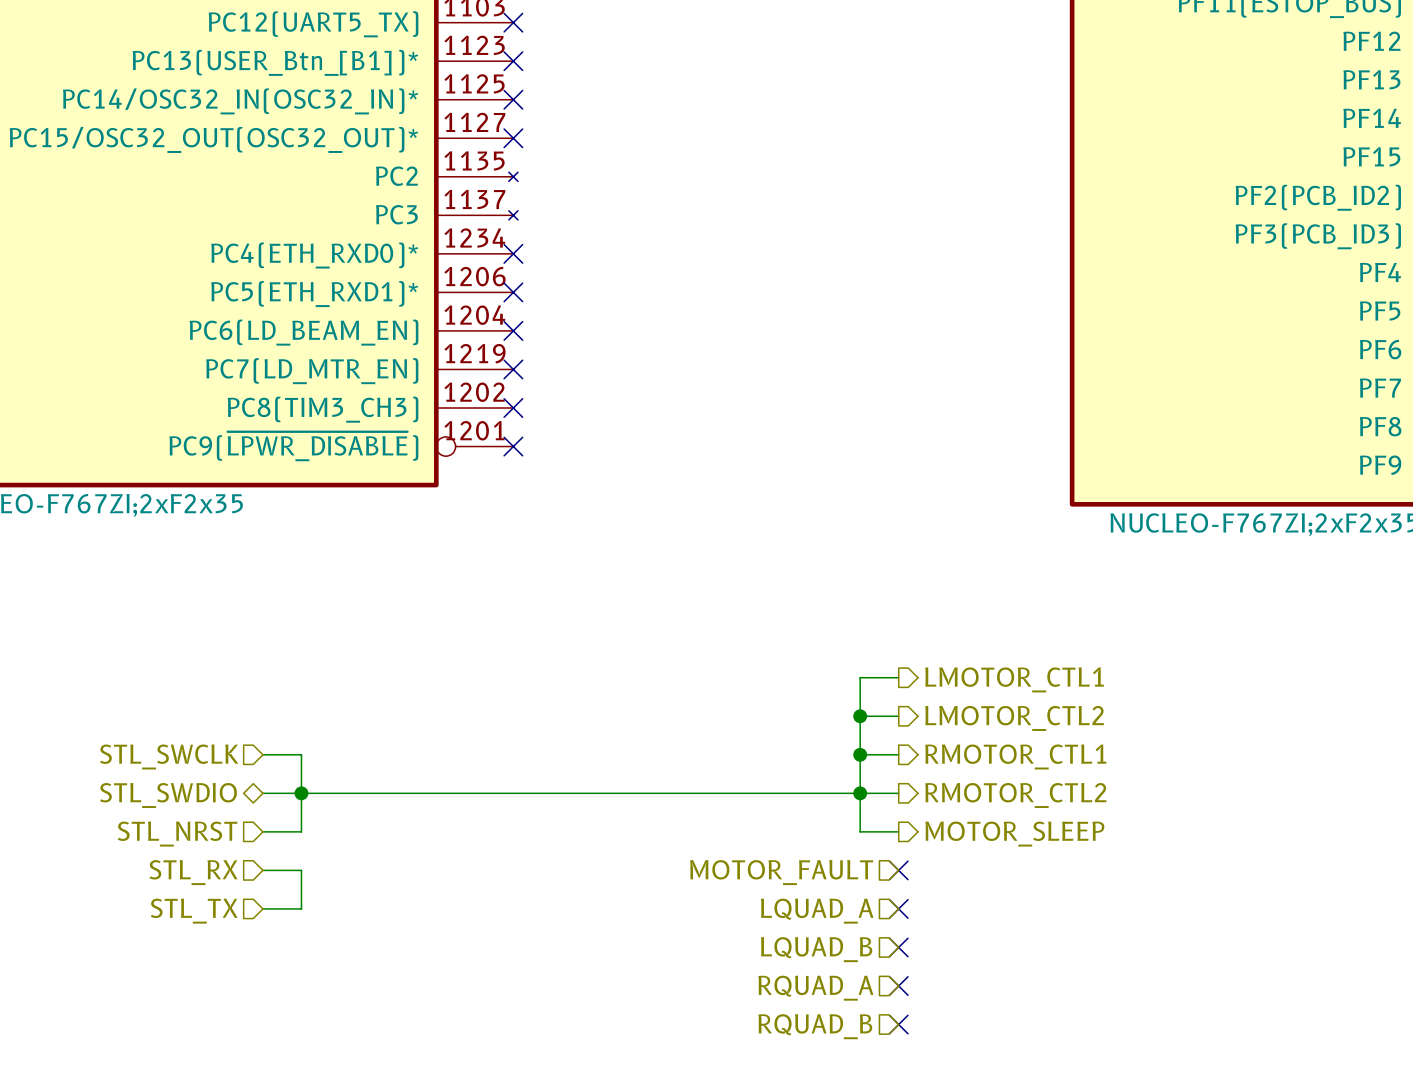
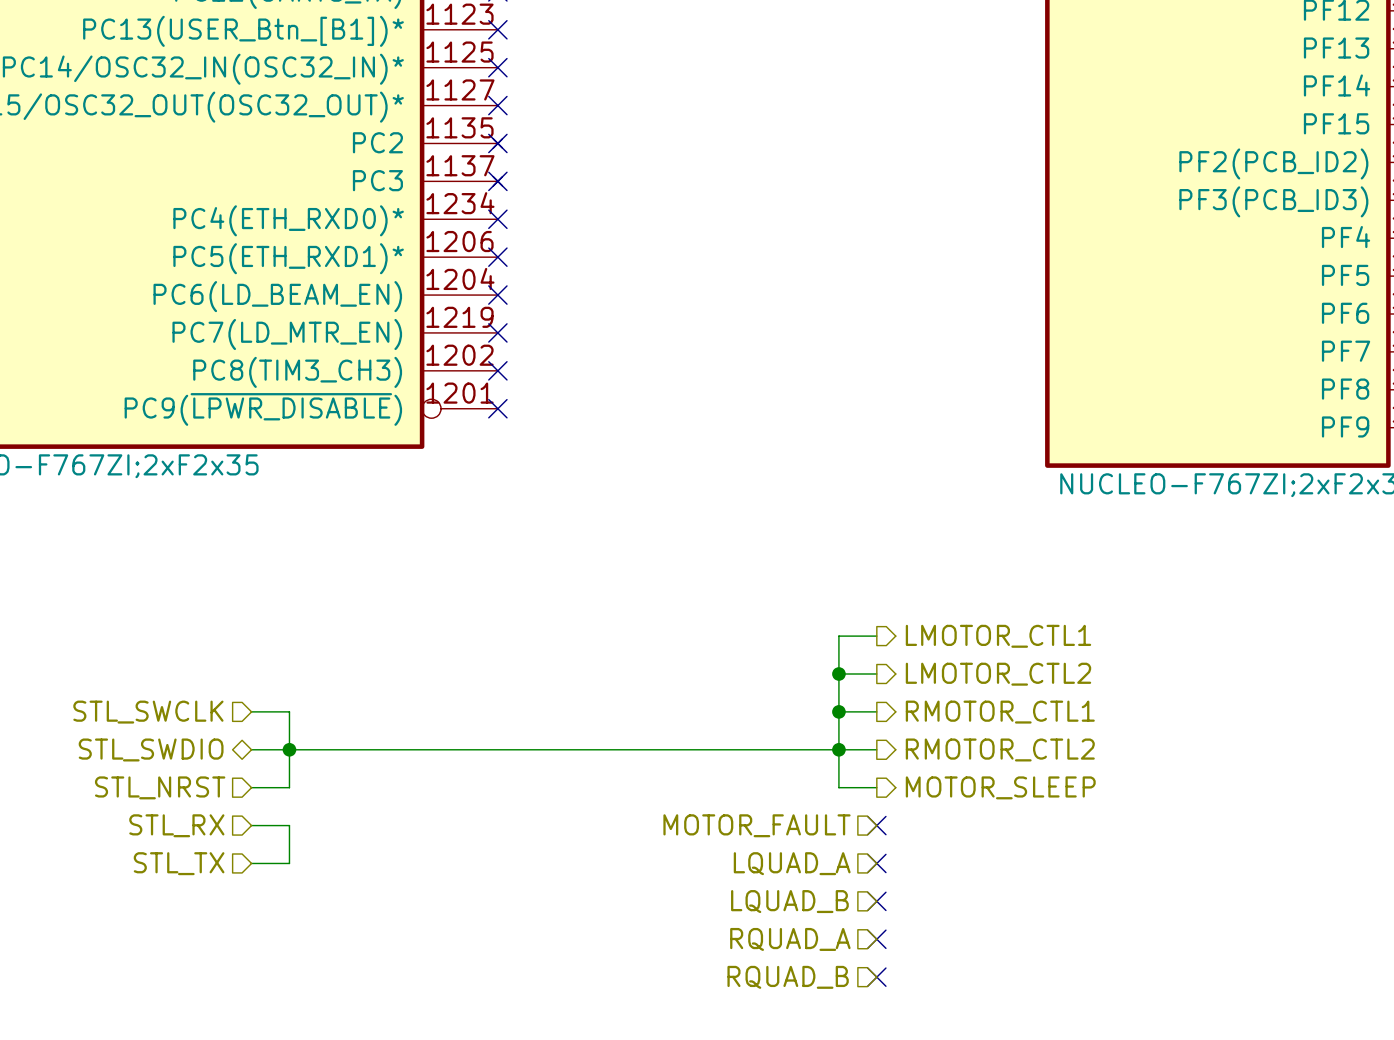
no-connect mark: none -> (497, 143)
no-connect mark: none -> (497, 181)

